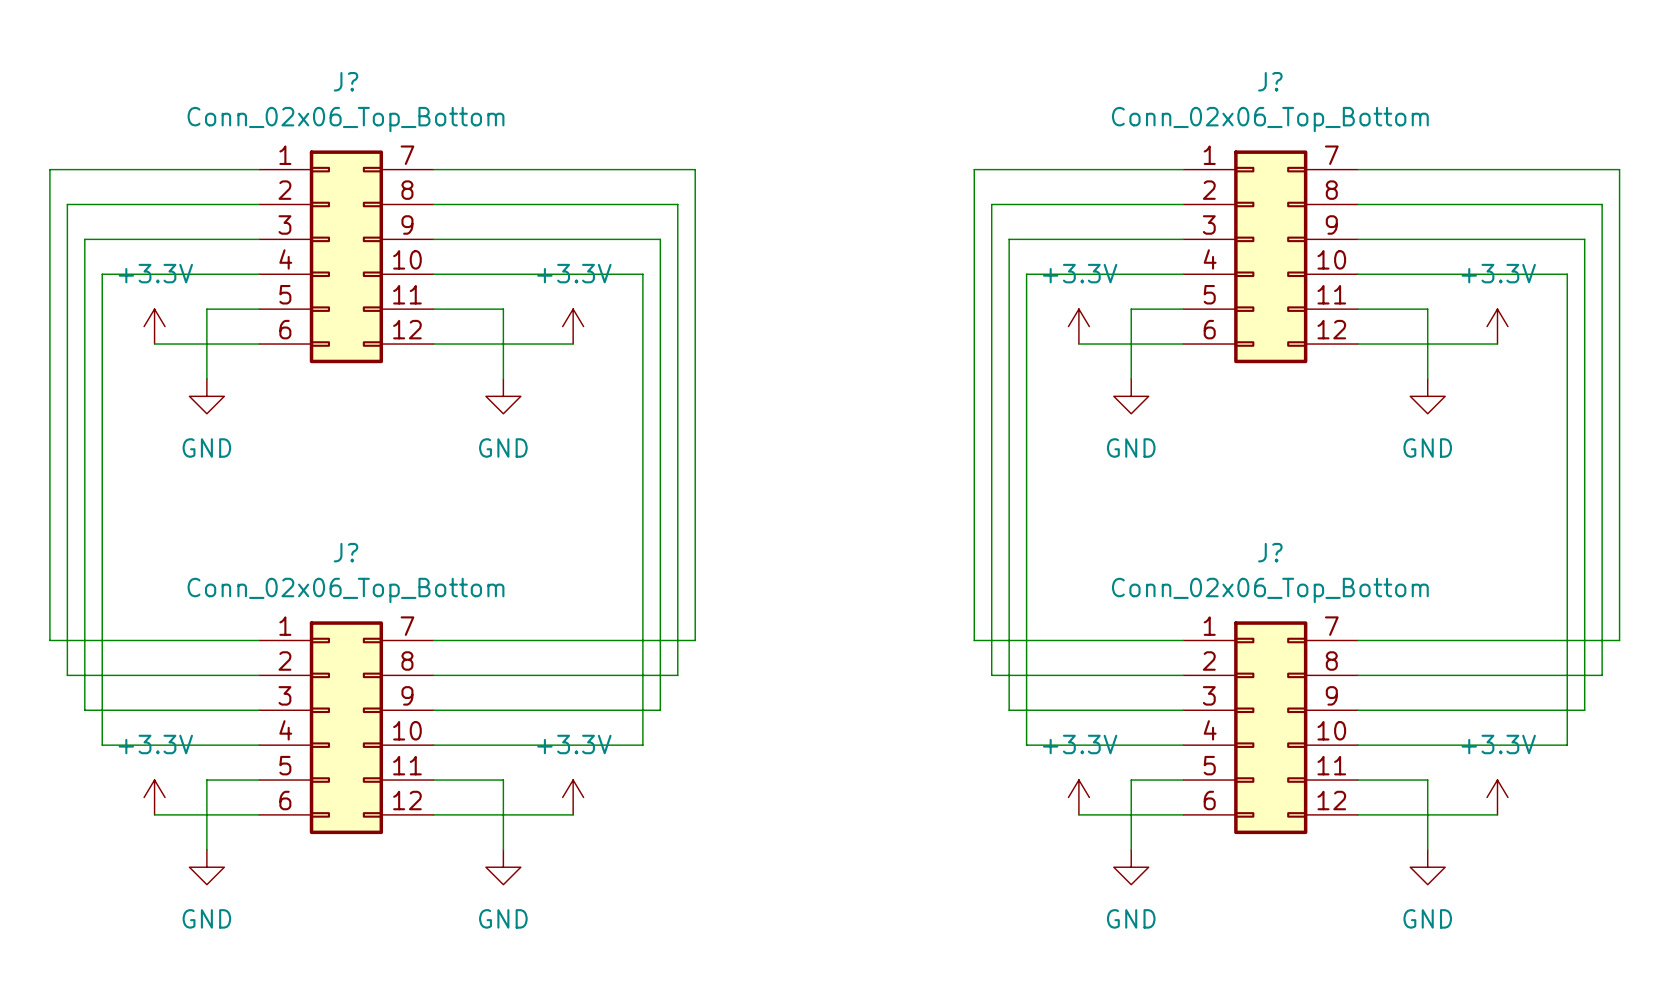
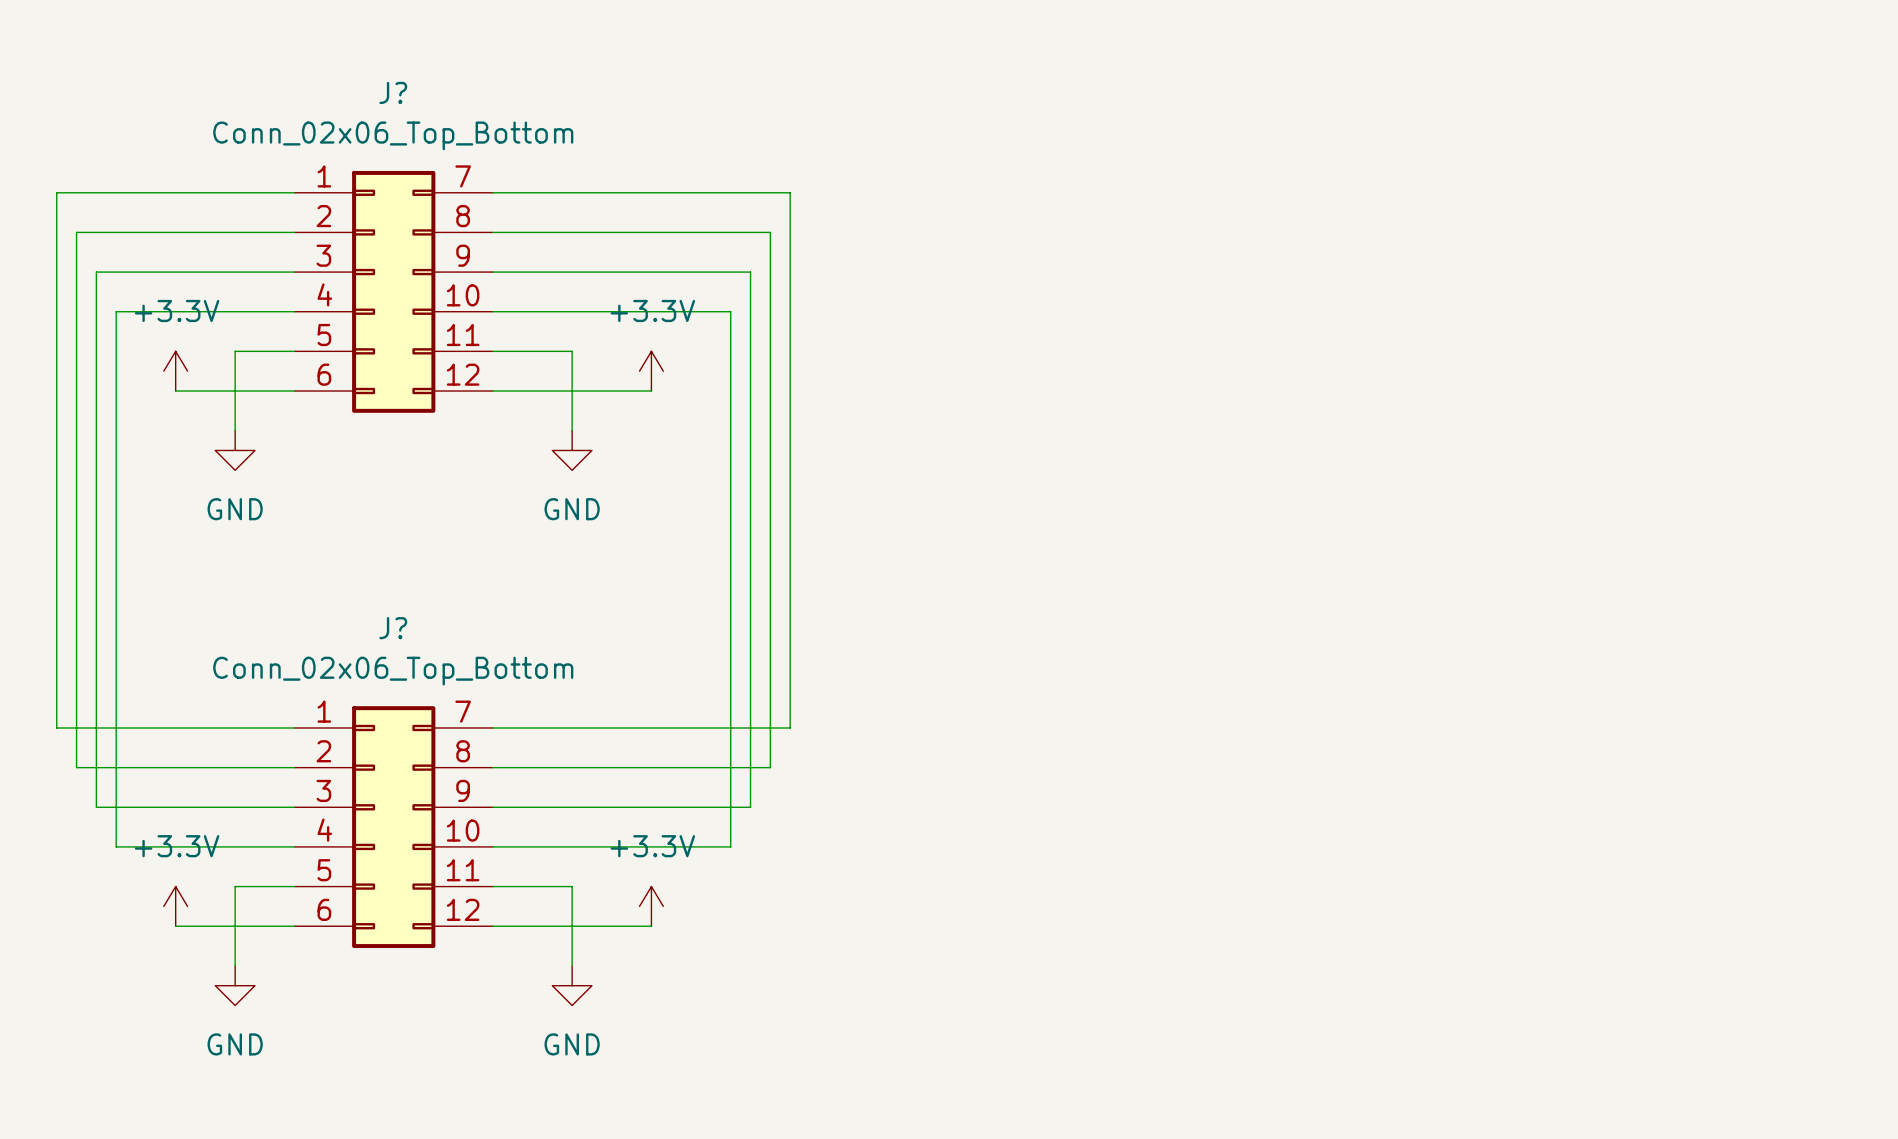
wire: (1183, 169) (974, 169) (974, 640) (1183, 640) -> none
wire: (1357, 169) (1619, 169) (1619, 640) (1357, 640) -> none
wire: (1183, 204) (991, 204) (991, 675) (1183, 675) -> none
wire: (1357, 204) (1602, 204) (1602, 675) (1357, 675) -> none
wire: (1183, 239) (1009, 239) (1009, 710) (1183, 710) -> none
wire: (1357, 239) (1584, 239) (1584, 710) (1357, 710) -> none
J?: Conn_02x06_Top_Bottom (1270, 256) -> none
wire: (1183, 274) (1026, 274) (1026, 745) (1183, 745) -> none
wire: (1357, 274) (1567, 274) (1567, 745) (1357, 745) -> none
wire: (1183, 309) (1131, 309) (1131, 378) -> none
wire: (1357, 309) (1427, 309) (1427, 378) -> none
power symbol: +3.3V (1078, 326) -> none
power symbol: +3.3V (1497, 326) -> none
wire: (1078, 344) (1183, 344) -> none
wire: (1357, 344) (1497, 344) -> none
power symbol: GND (1131, 396) -> none
power symbol: GND (1427, 396) -> none
J?: Conn_02x06_Top_Bottom (1270, 727) -> none
wire: (1183, 780) (1131, 780) (1131, 849) -> none
wire: (1357, 780) (1427, 780) (1427, 849) -> none
power symbol: +3.3V (1078, 797) -> none
power symbol: +3.3V (1497, 797) -> none
wire: (1078, 814) (1183, 814) -> none
wire: (1357, 814) (1497, 814) -> none
power symbol: GND (1131, 867) -> none
power symbol: GND (1427, 867) -> none

